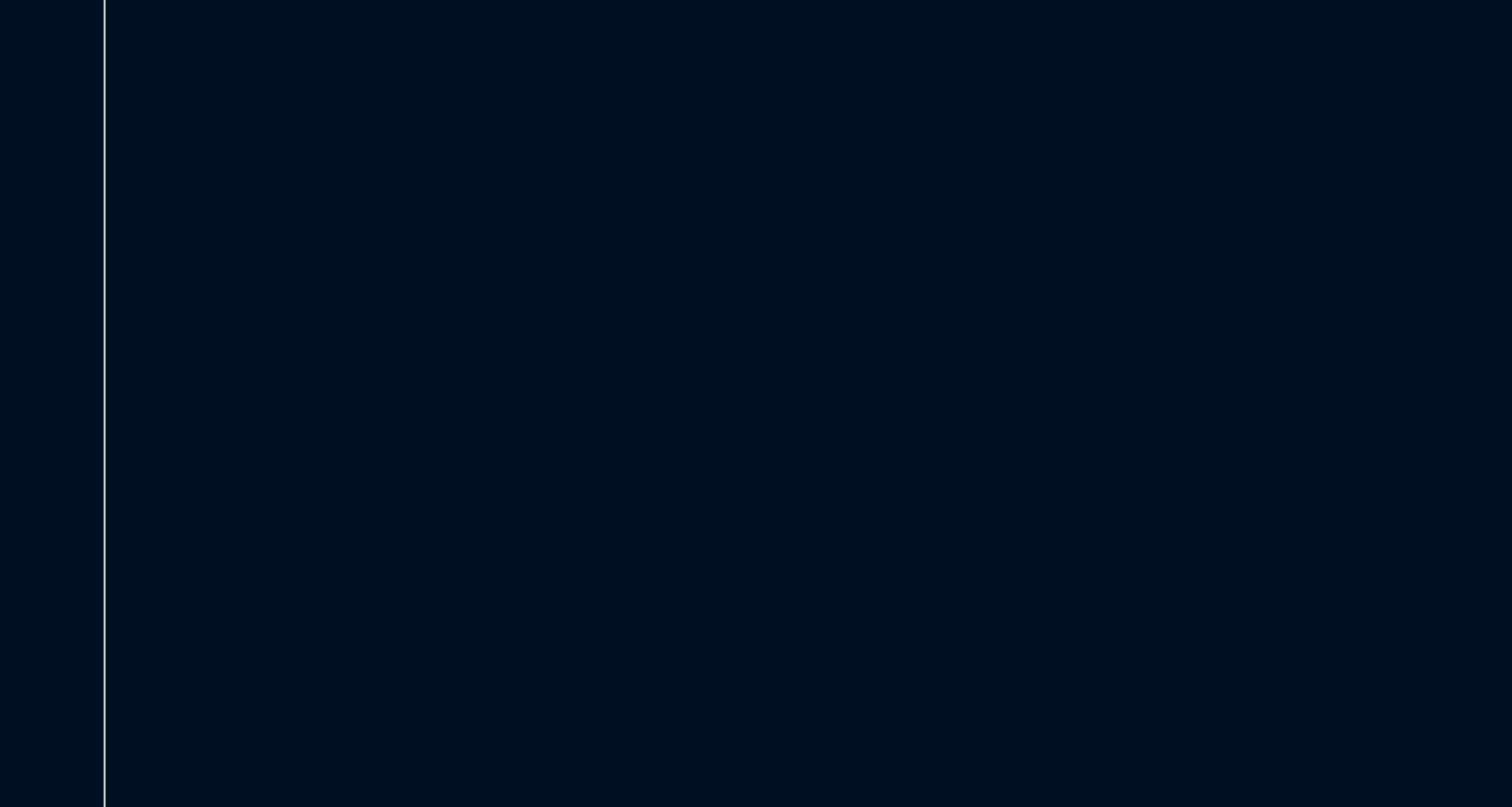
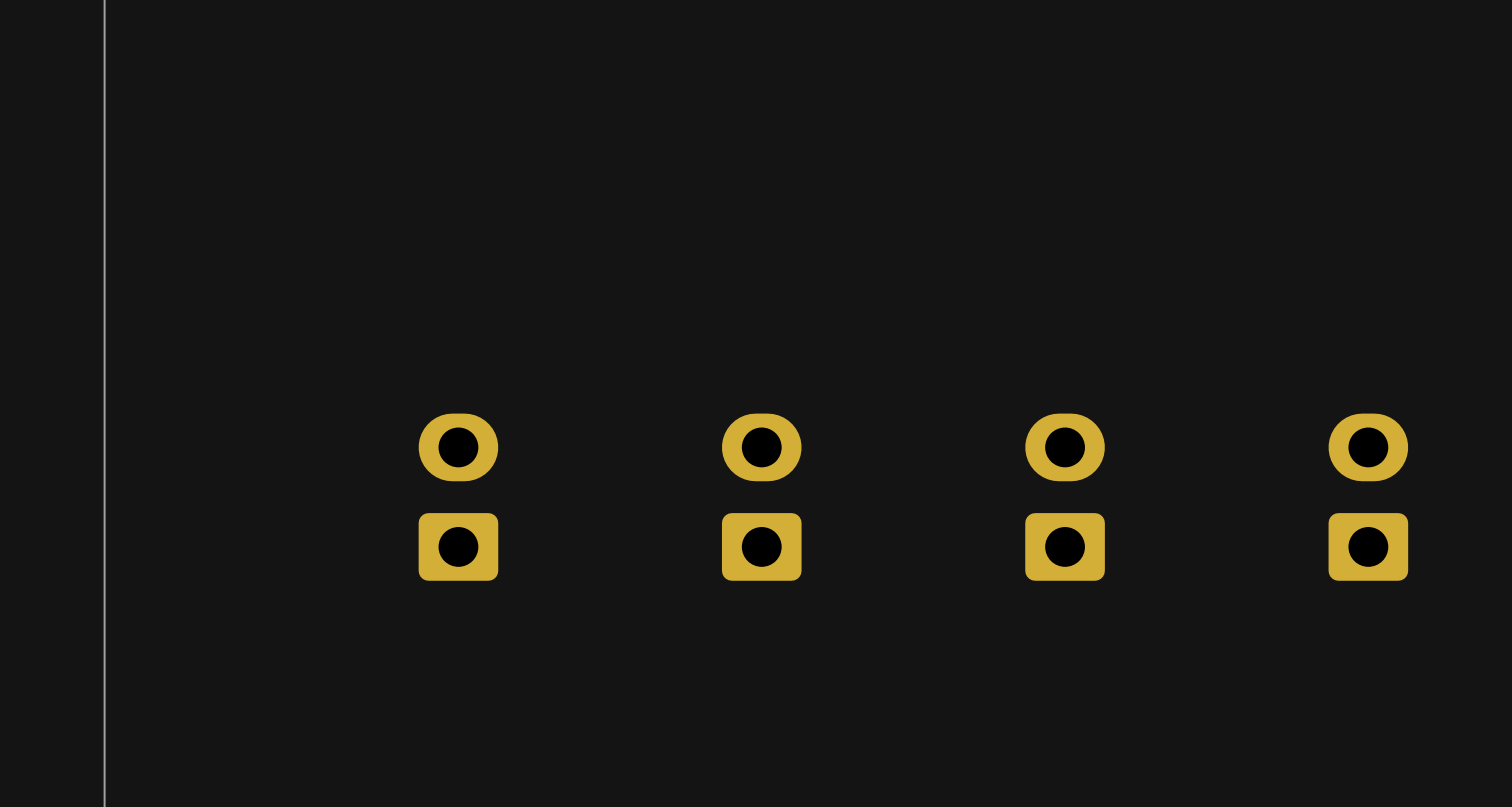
part: none -> (458, 497)
part: none -> (761, 497)
part: none -> (1065, 497)
part: none -> (1368, 497)

